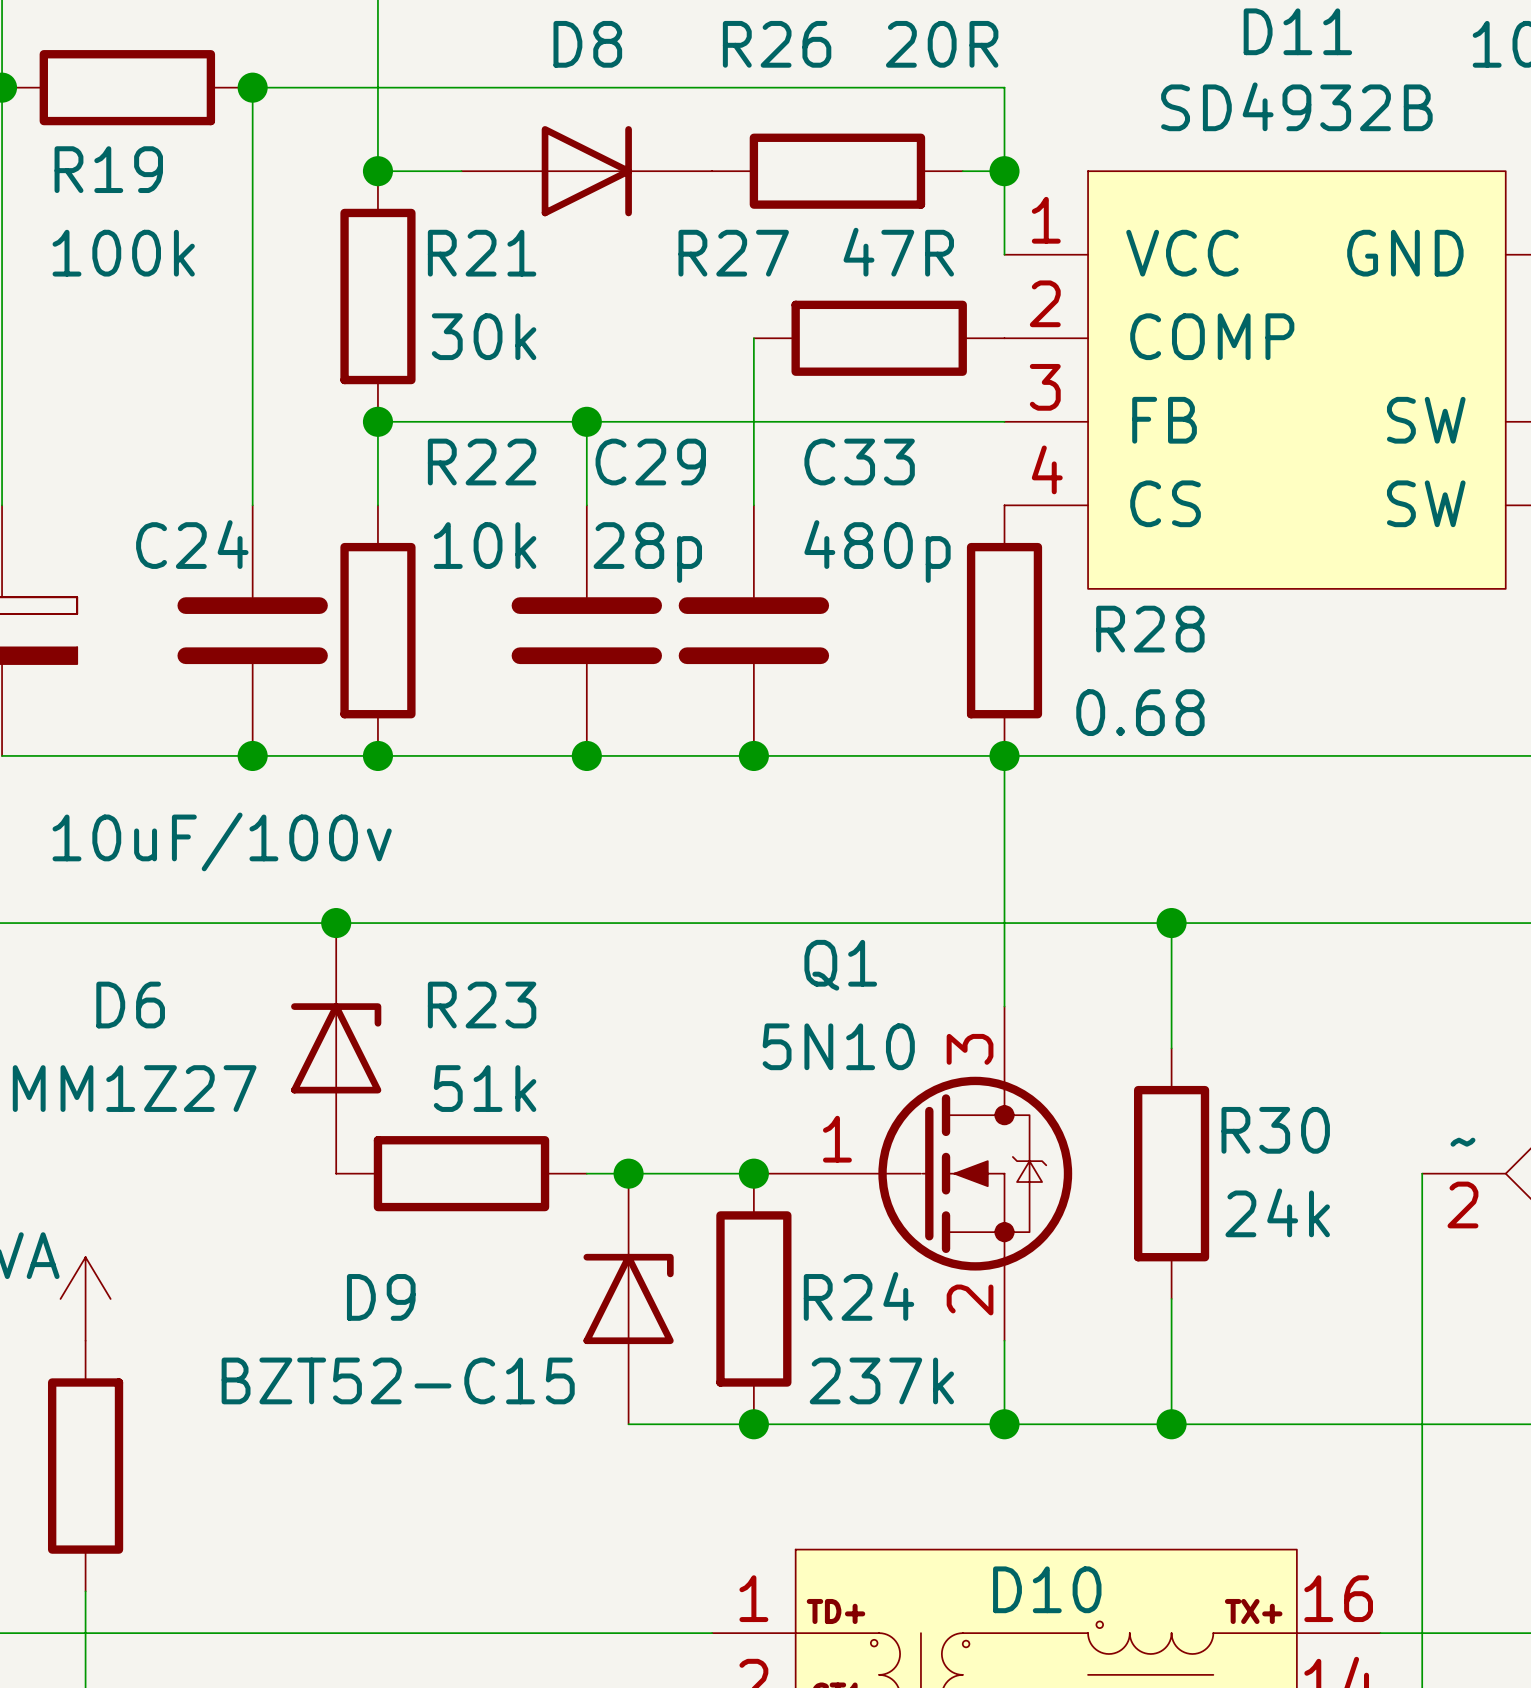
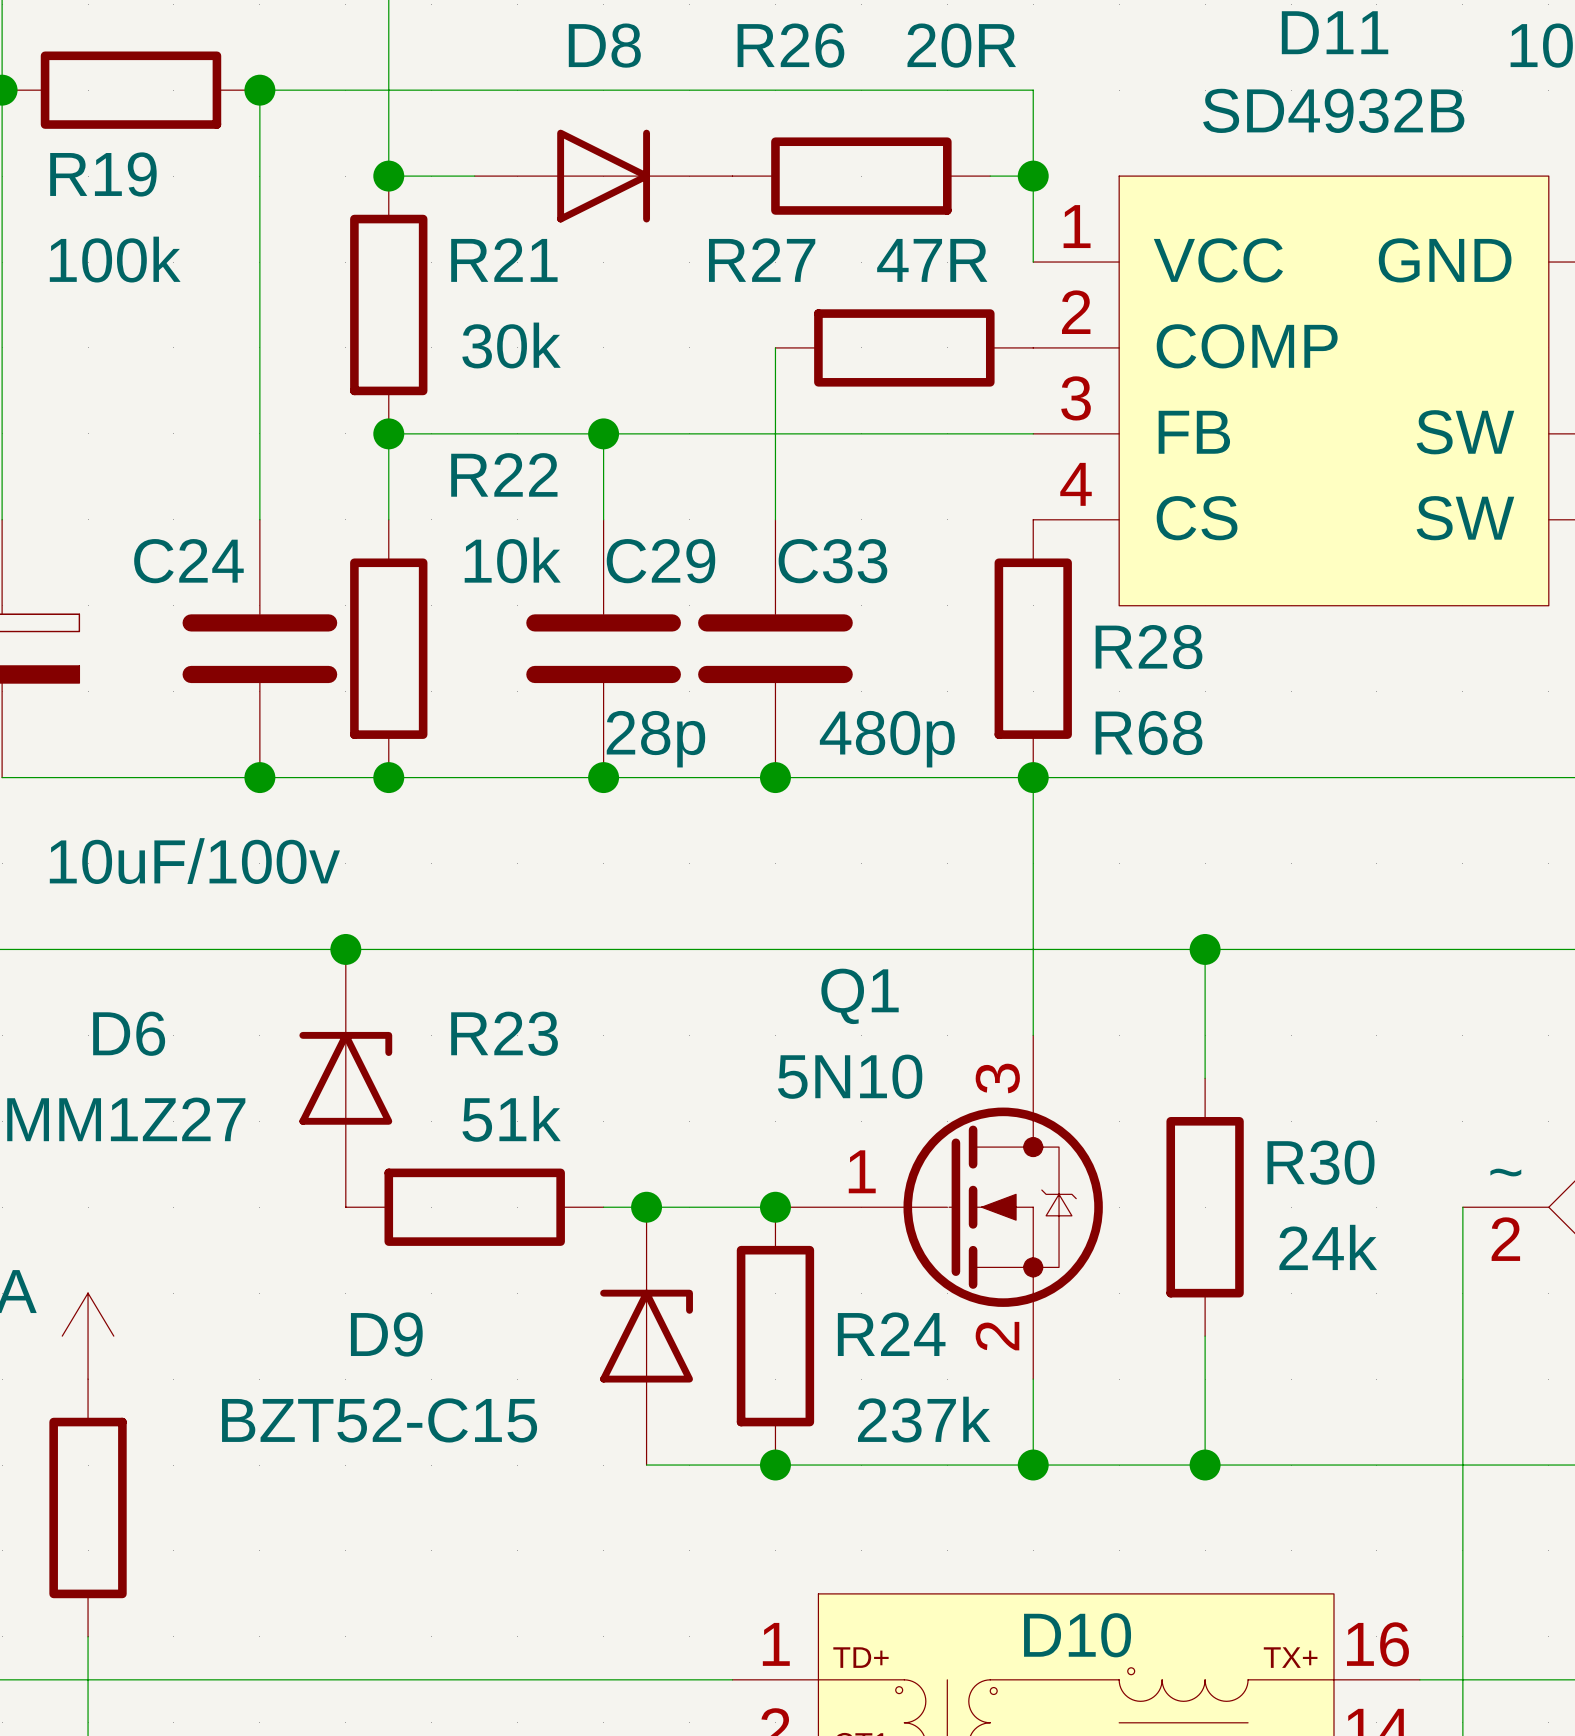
C29 name position: C29 (650, 462) -> C29 (660, 561)
C33 name position: C33 (859, 462) -> C33 (832, 561)
C33 value position: 480p (877, 551) -> 480p (887, 739)
C29 value position: 28p (647, 552) -> 28p (655, 739)
R28 name position: R28 (1150, 629) -> R28 (1149, 647)
R28 value: 0.68 (1140, 712) -> R68 (1149, 733)

